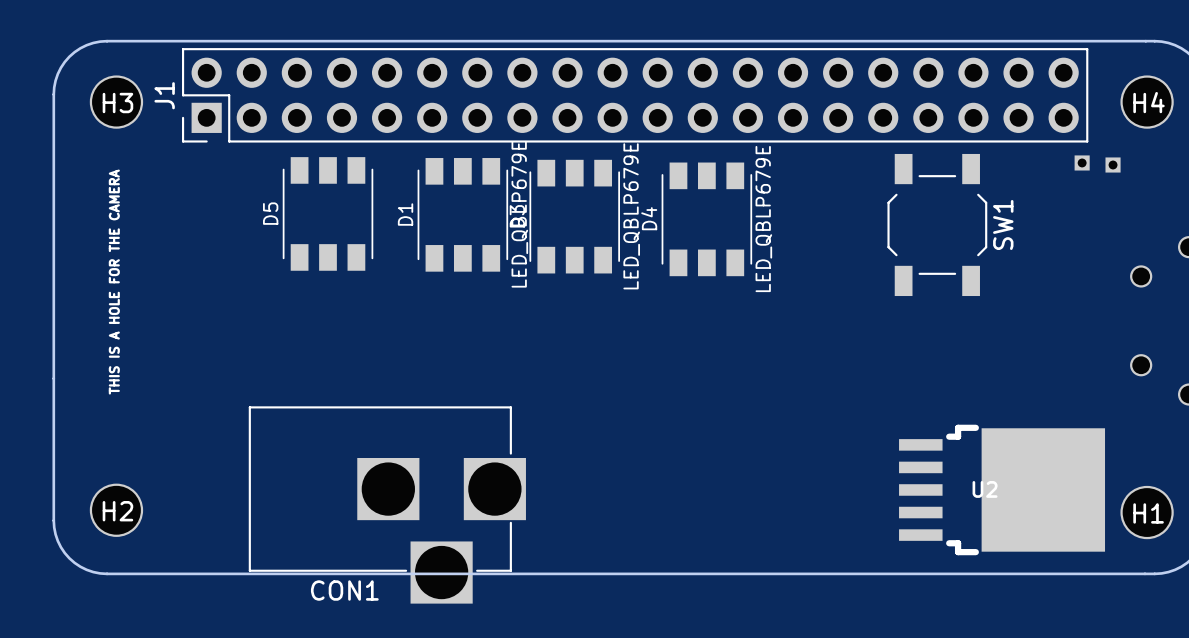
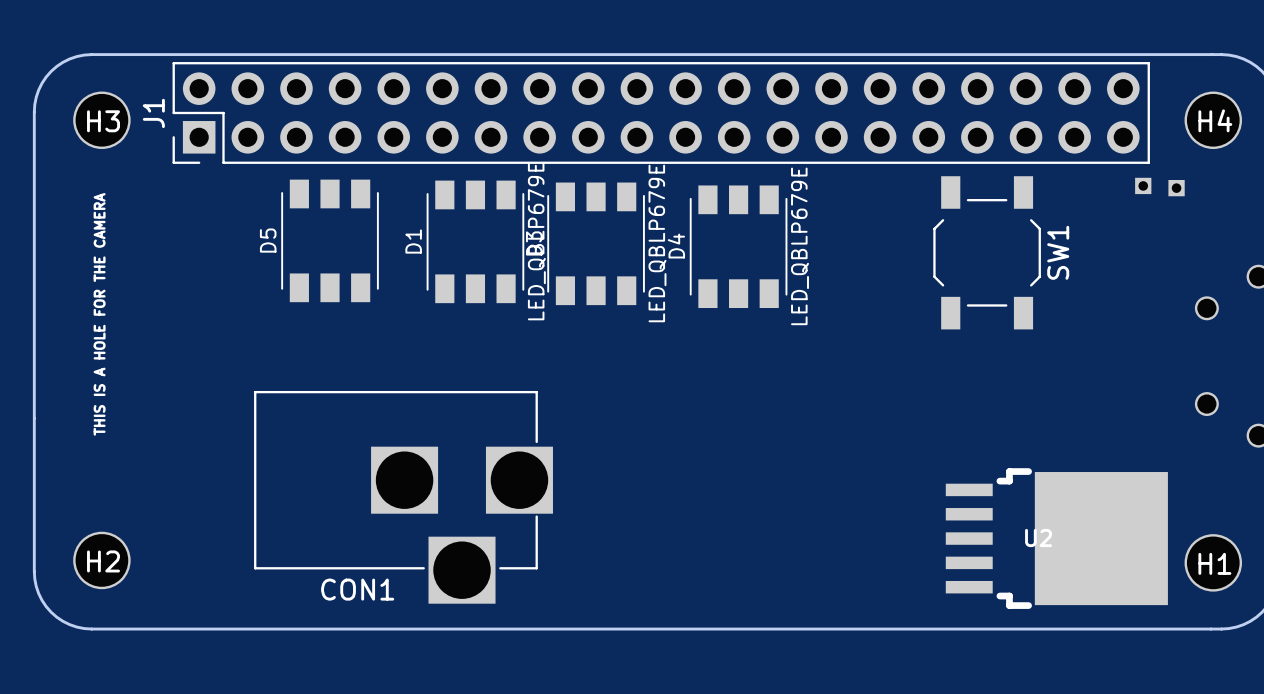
CON1 position: (387, 504) -> (403, 497)

